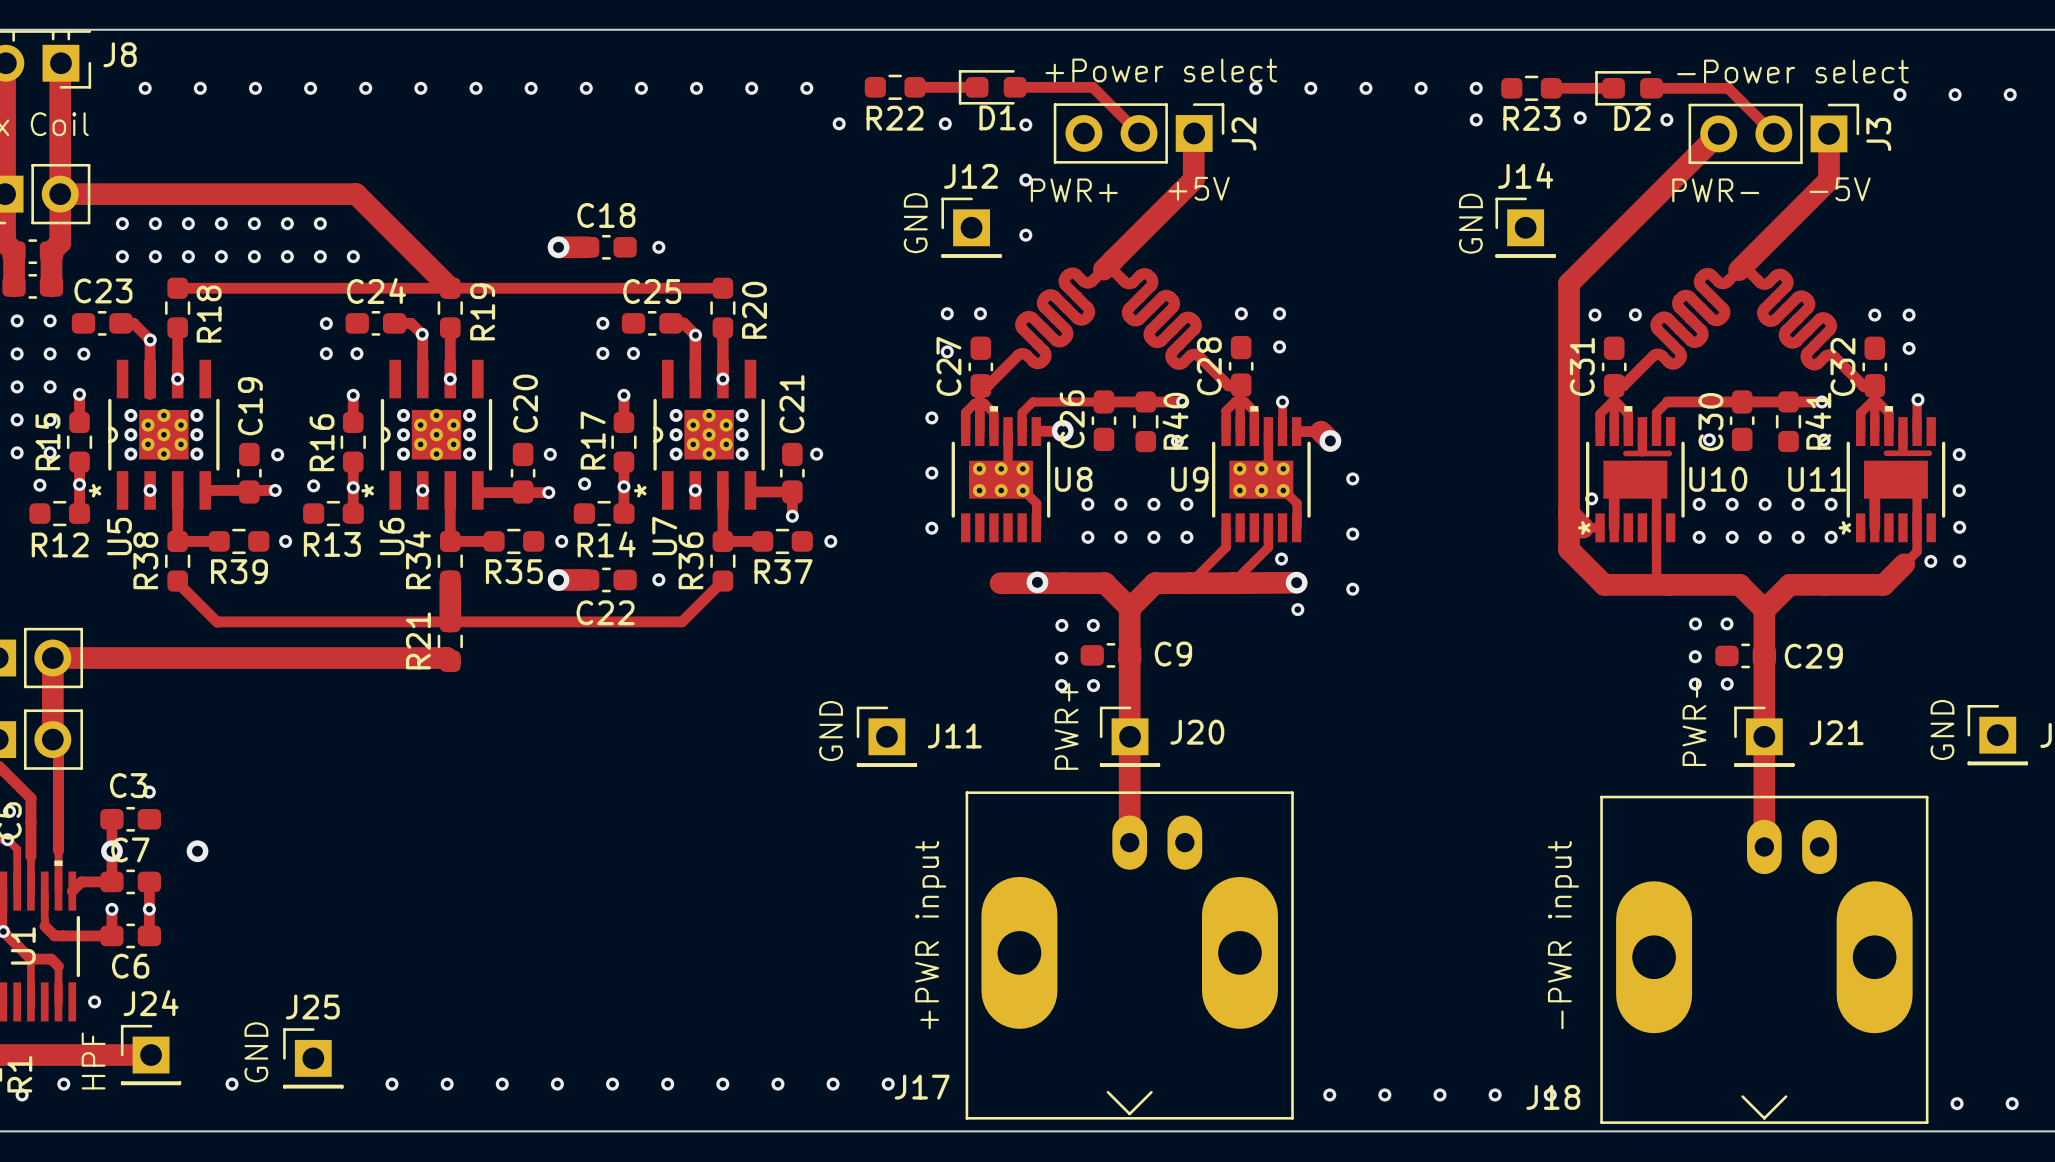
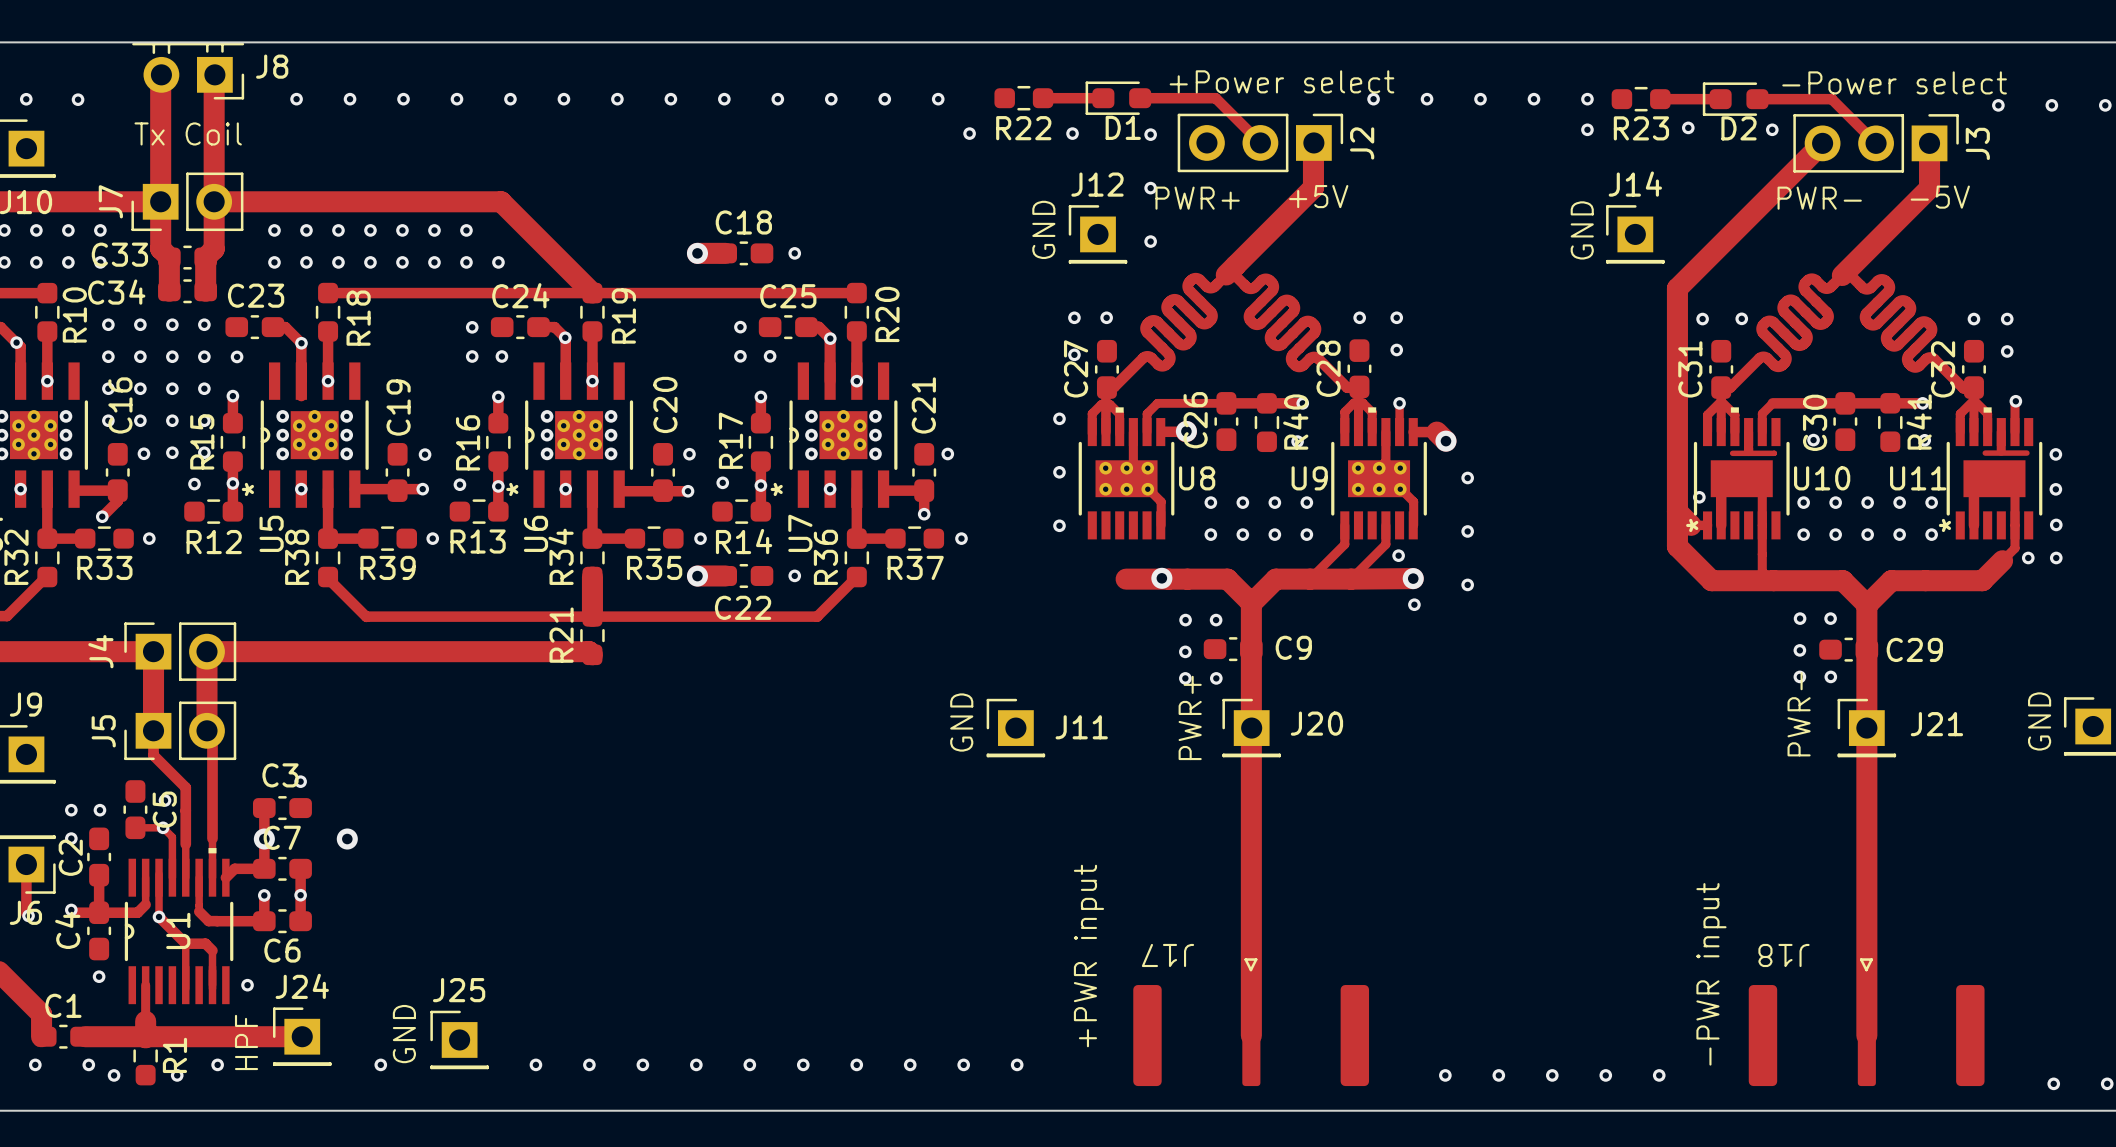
J17 footprint: [965, 791, 1294, 1120] -> [1133, 958, 1370, 1087]
J18 footprint: [1600, 795, 1929, 1124] -> [1748, 958, 1985, 1087]
track: none -> (1251, 830) (1251, 1035)
track: none -> (1866, 834) (1866, 1035)
text position: +PWR input (930, 935) -> +PWR input (1088, 956)
text position: -PWR input (1563, 935) -> -PWR input (1711, 974)
J17 name position: J17 (922, 1087) -> J17 (1168, 955)
J18 name position: J18 (1553, 1097) -> J18 (1783, 955)

